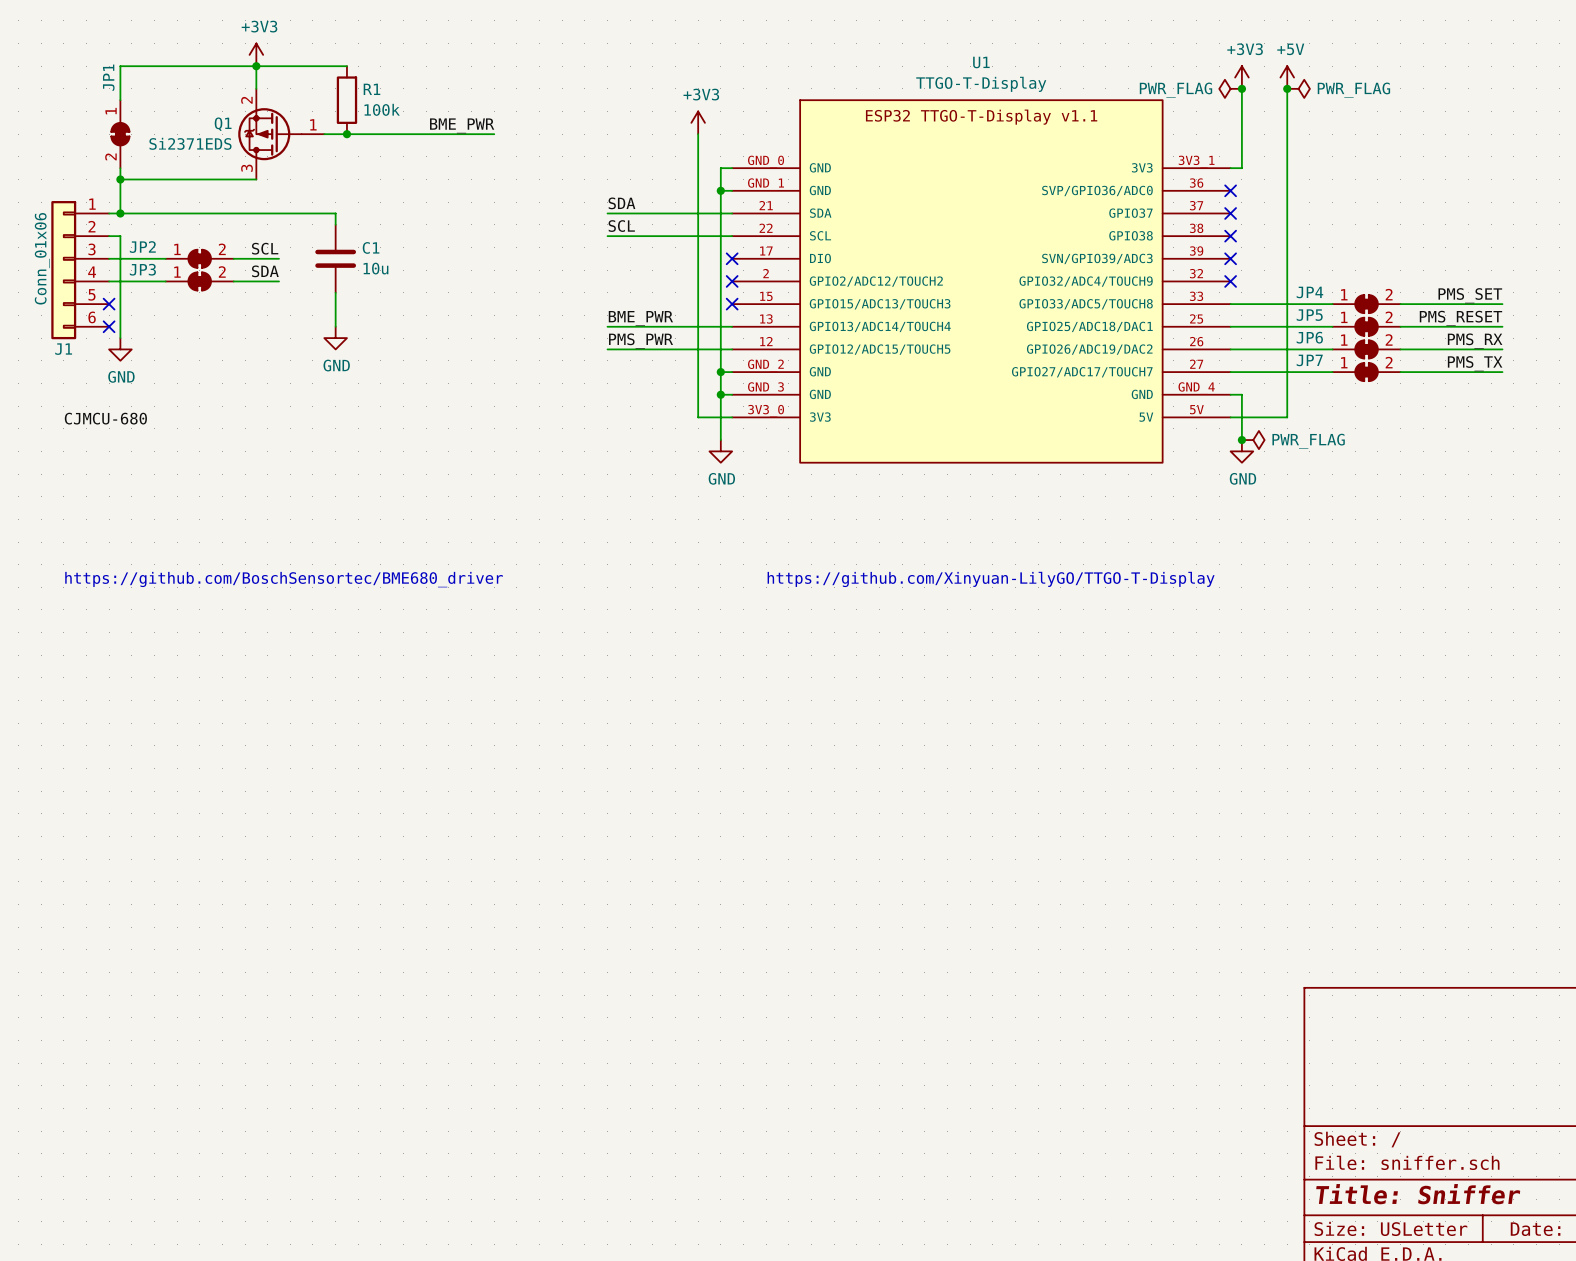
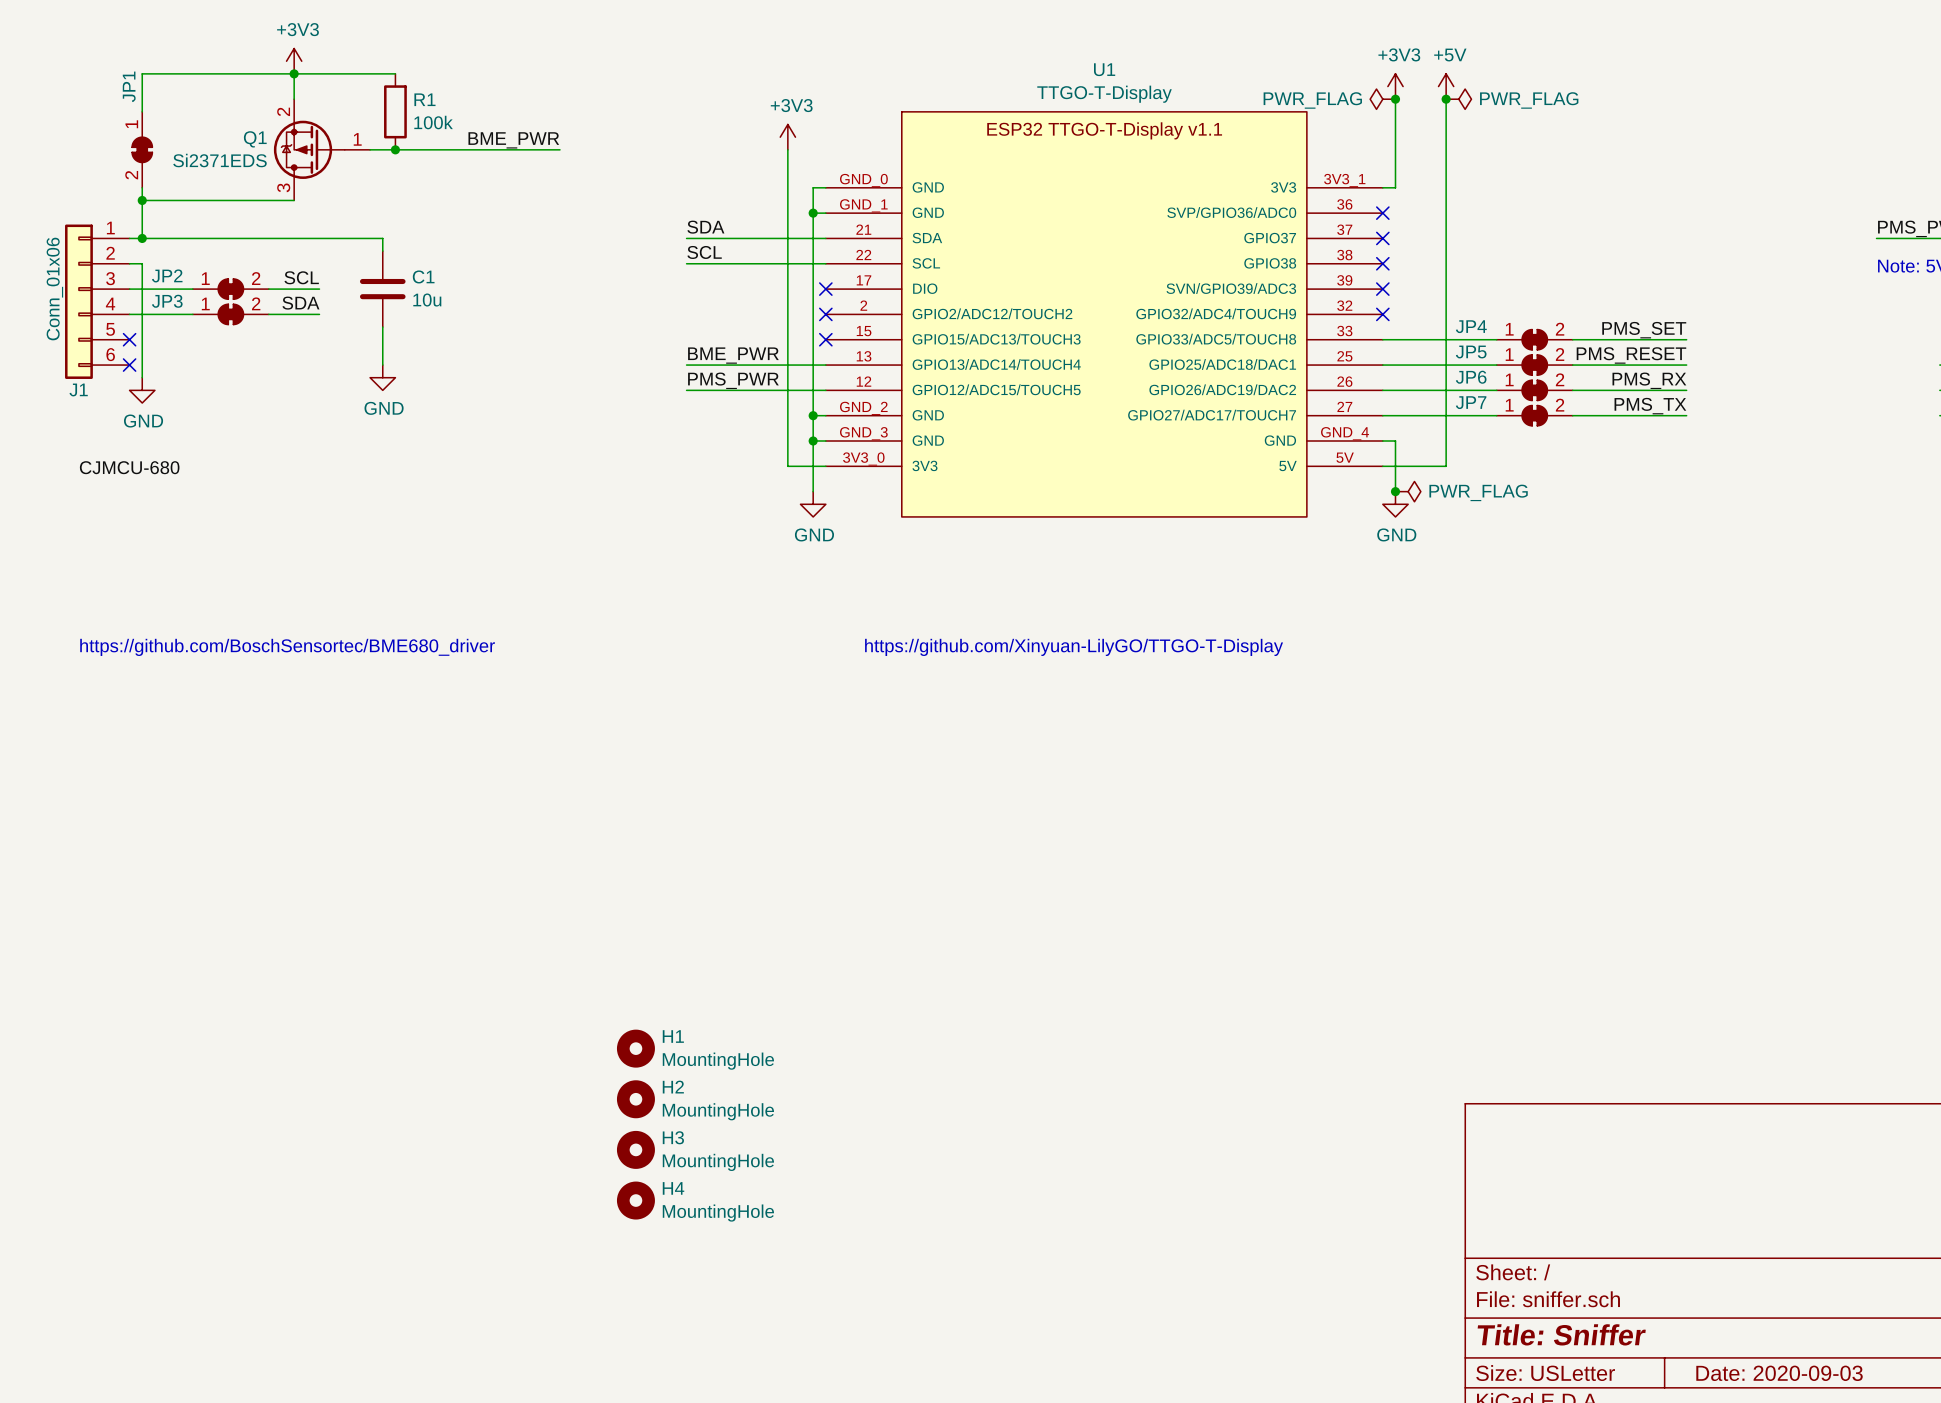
H1: none -> MountingHole (635, 1048)
H2: none -> MountingHole (635, 1099)
H3: none -> MountingHole (635, 1149)
H4: none -> MountingHole (635, 1200)

